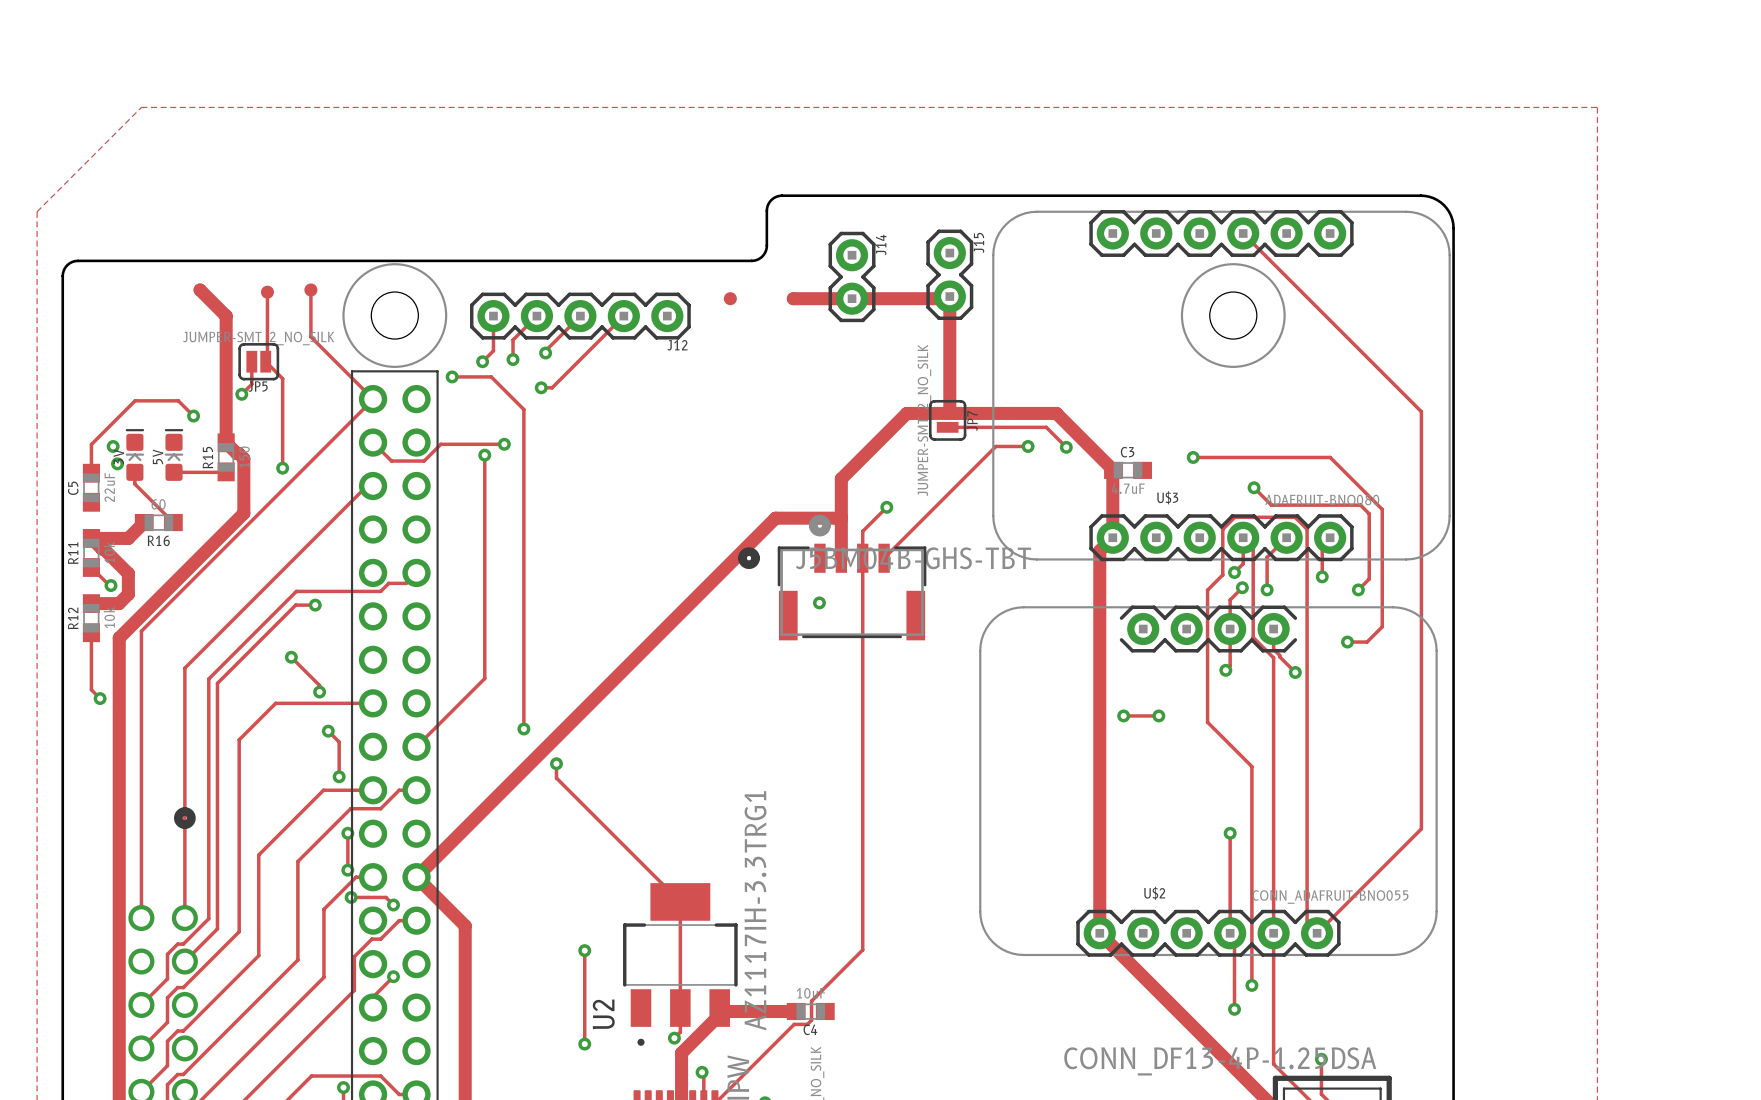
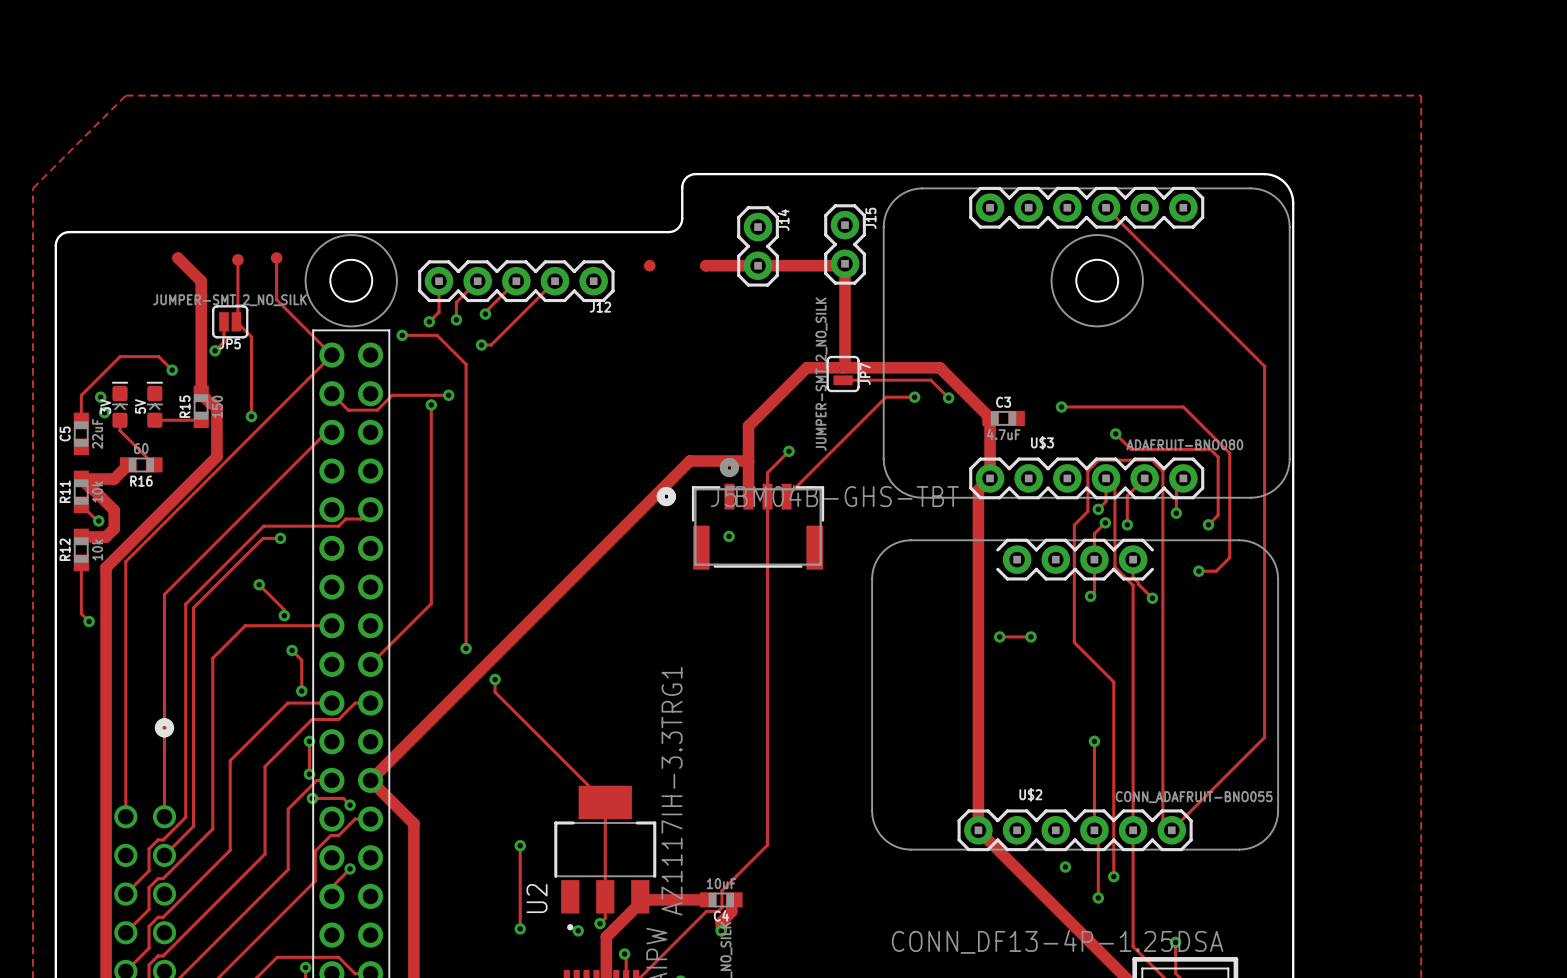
via: none -> (1065, 867)
track: none -> (734, 899) (731, 902) (731, 911) (721, 922) (721, 930)
via: none -> (578, 930)
via: none -> (721, 930)

